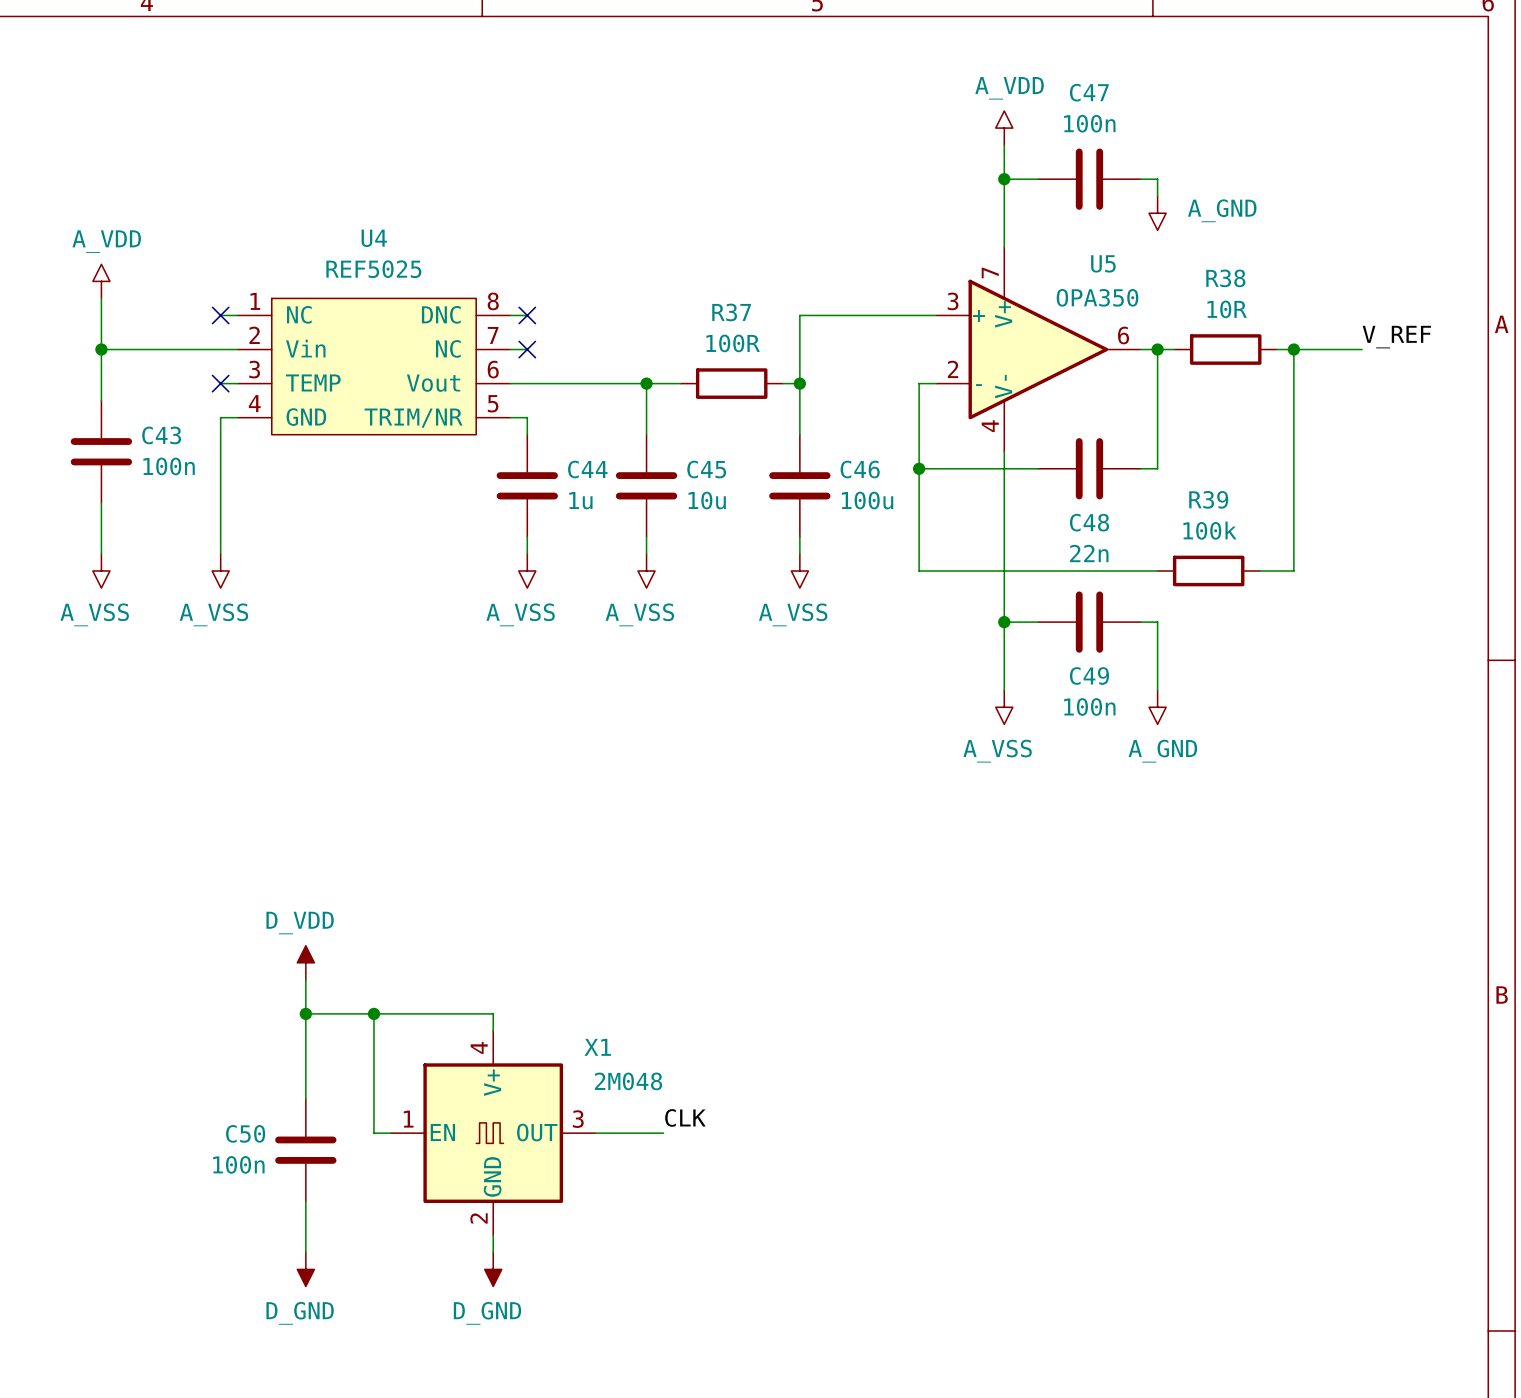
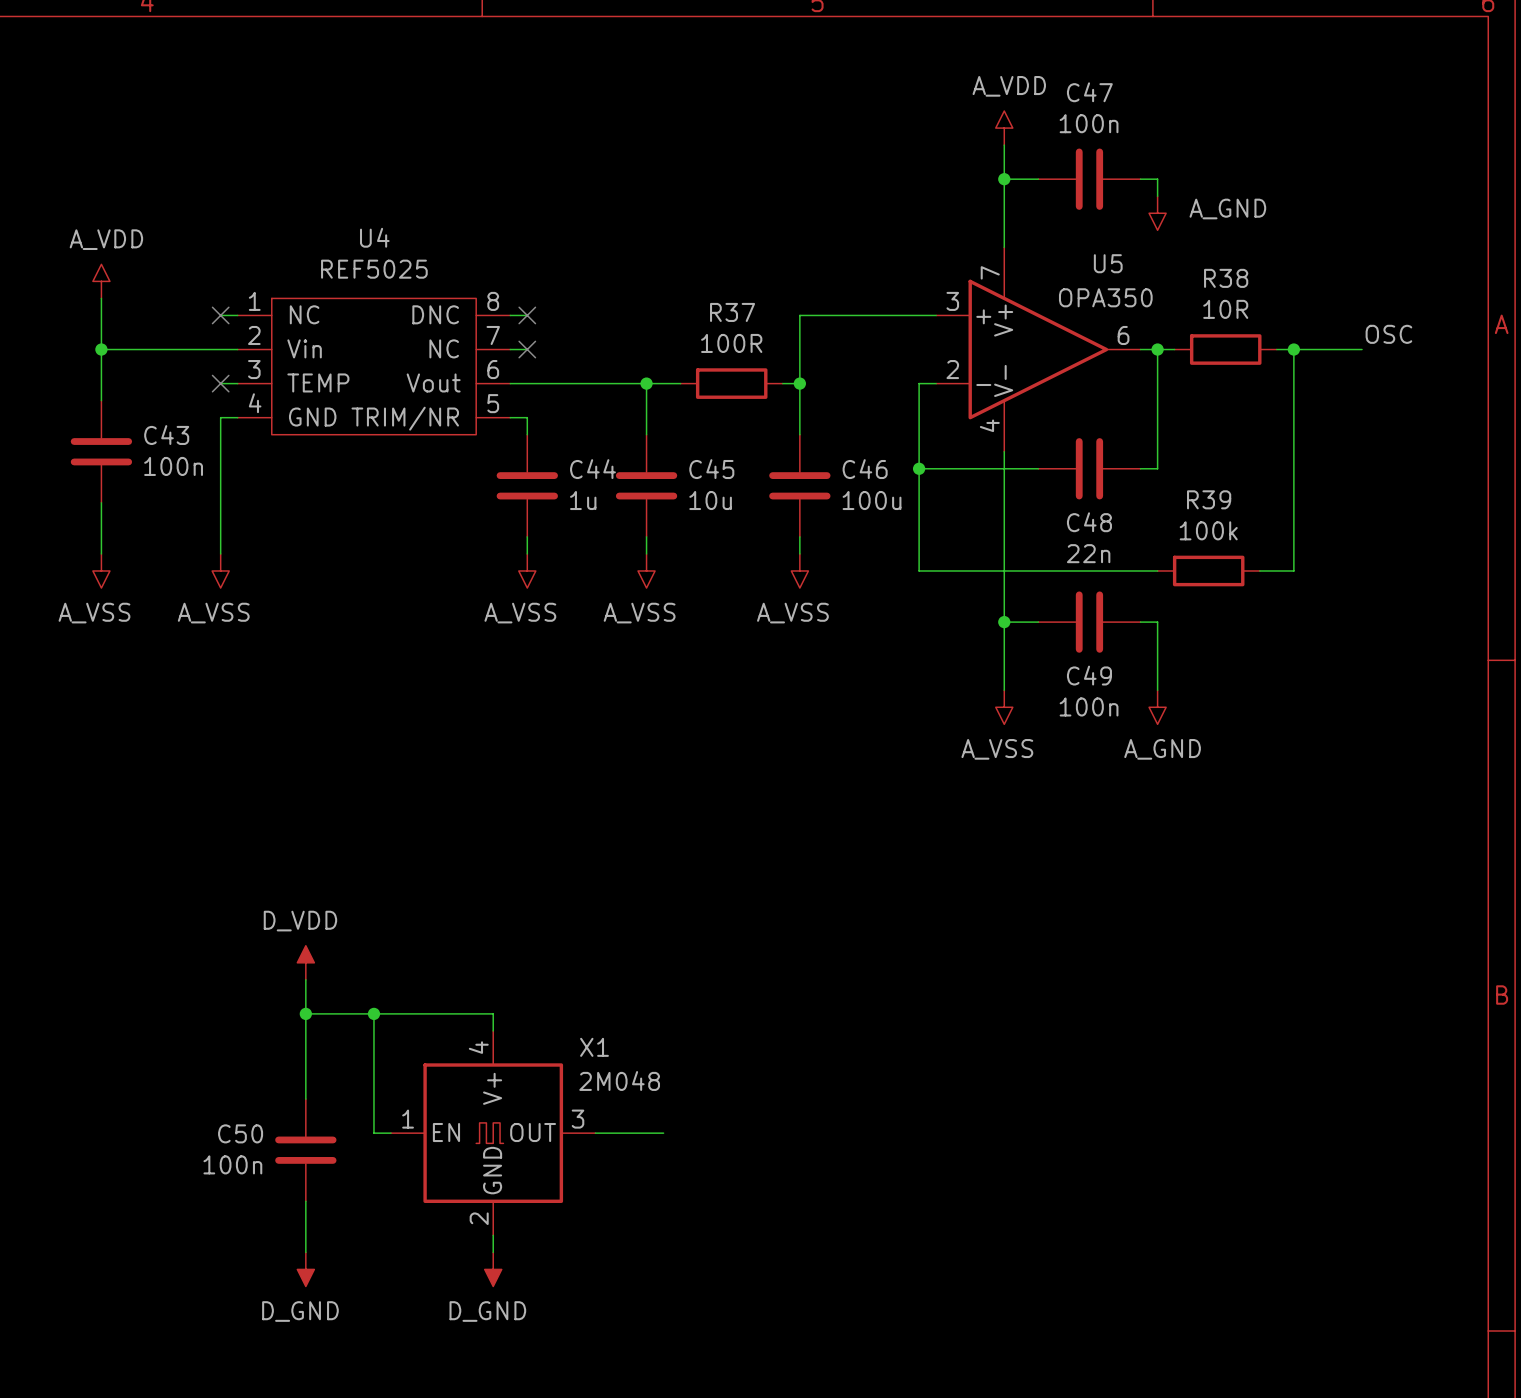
label: V_REF (1396, 337) -> OSC (1388, 334)
label: CLK (685, 1117) -> none

